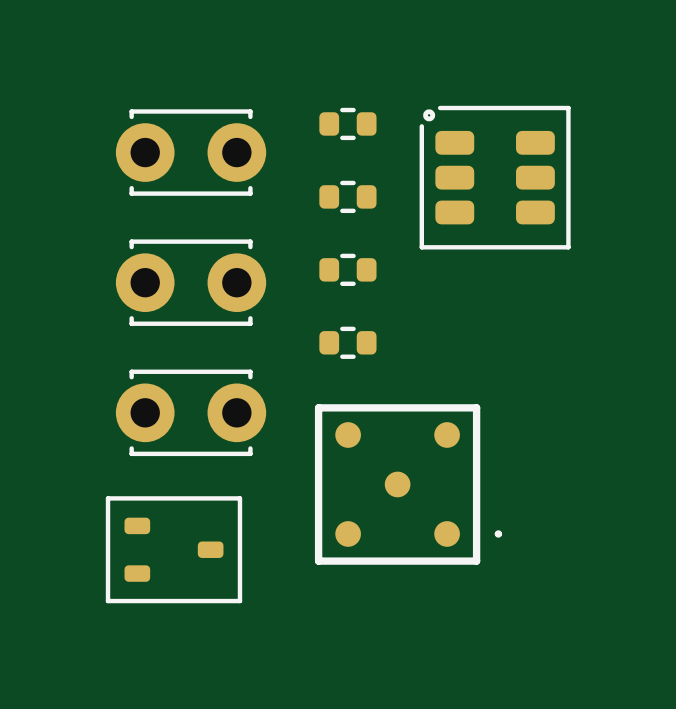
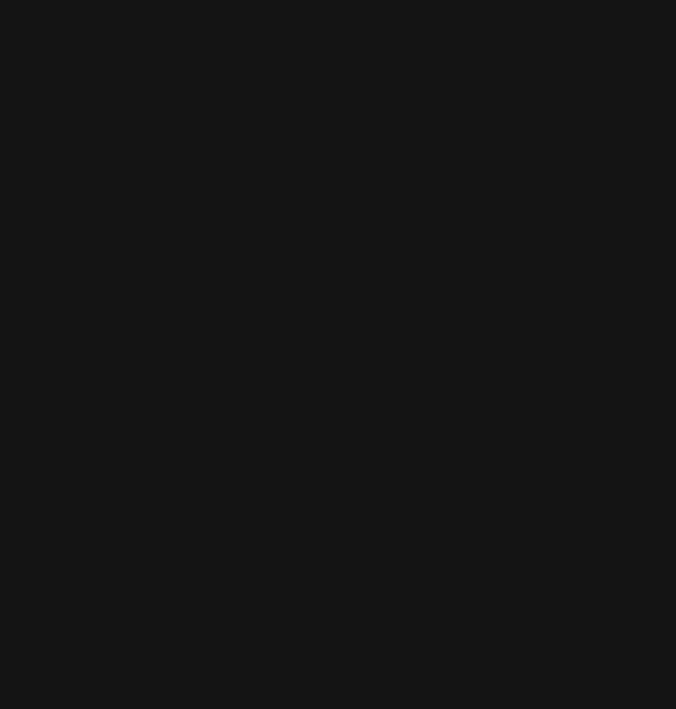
part: (347, 123) -> none
part: (191, 152) -> none
part: (495, 177) -> none
part: (347, 196) -> none
part: (347, 269) -> none
part: (191, 282) -> none
part: (347, 342) -> none
part: (191, 412) -> none
part: (408, 484) -> none
part: (173, 549) -> none

